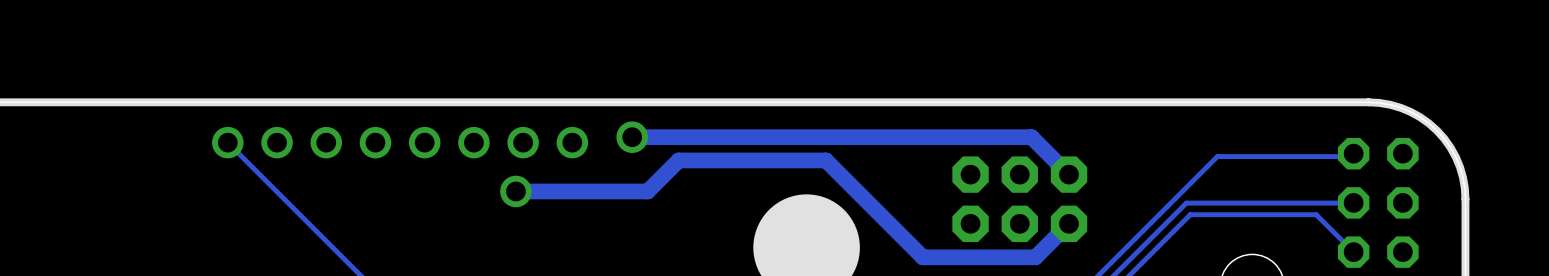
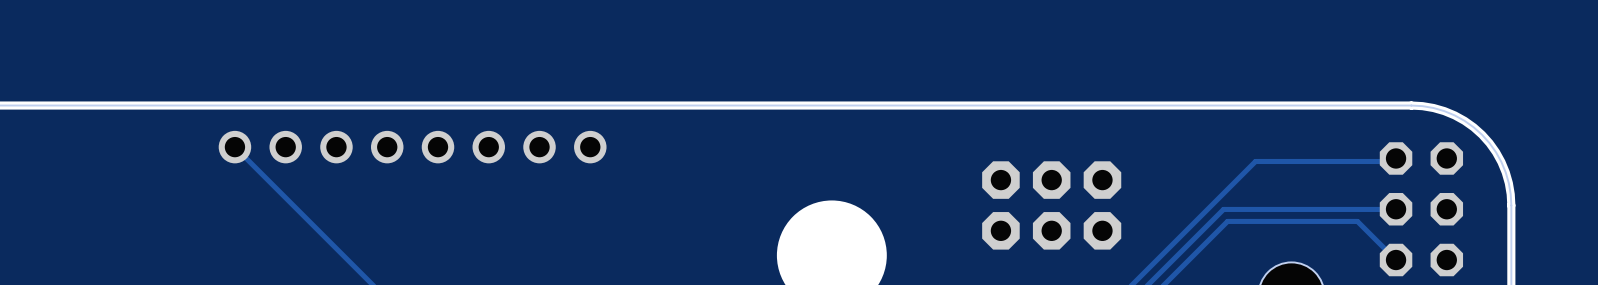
track: (632, 137) (1031, 137) (1068, 174) -> none
via: (632, 137) -> none
track: (515, 191) (647, 191) (678, 160) (825, 160) (922, 257) (1035, 257) (1068, 223) -> none
via: (515, 191) -> none

